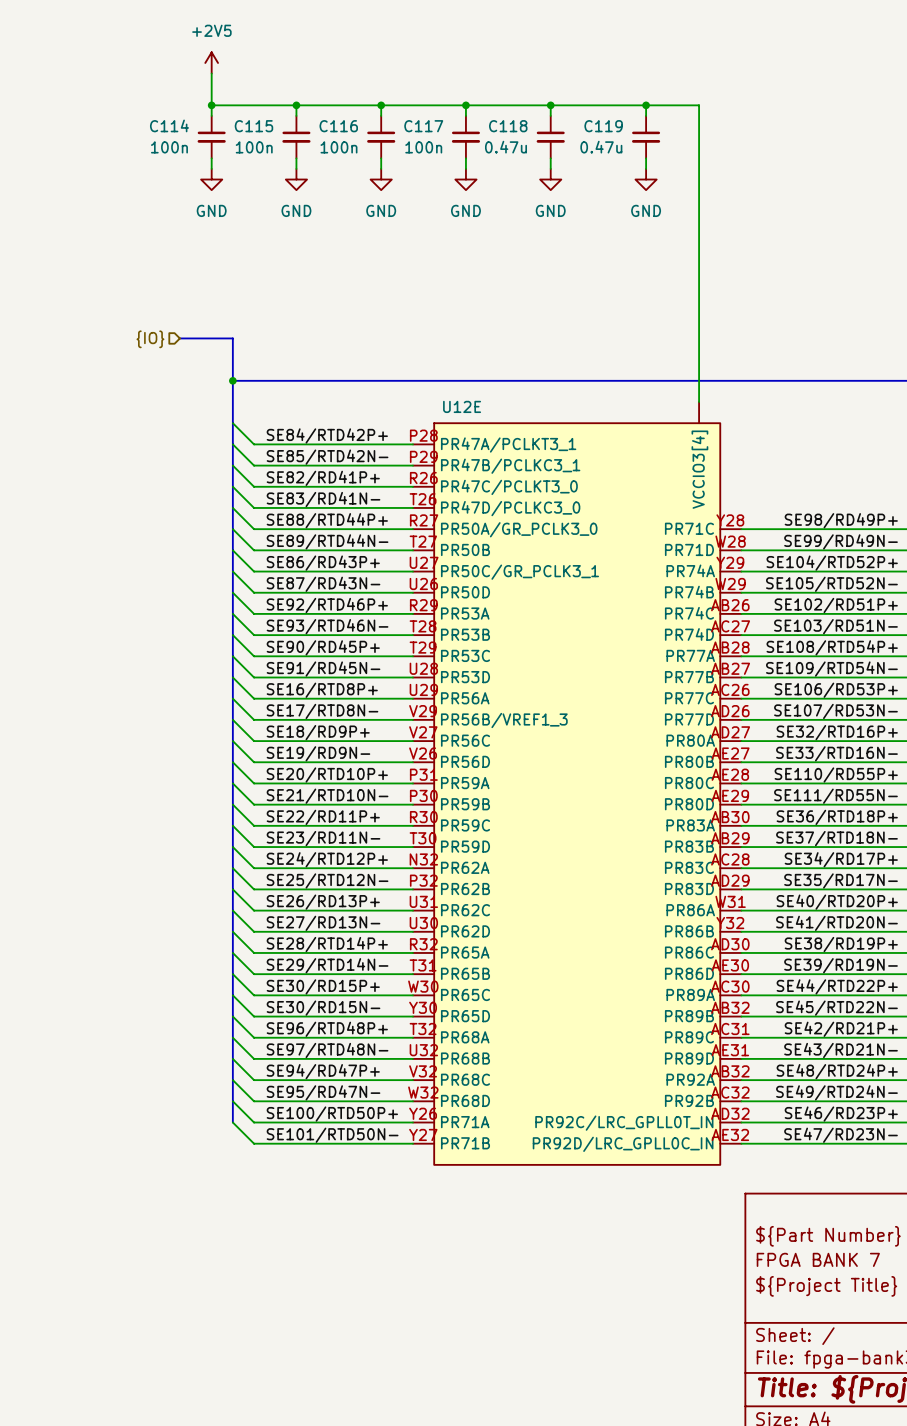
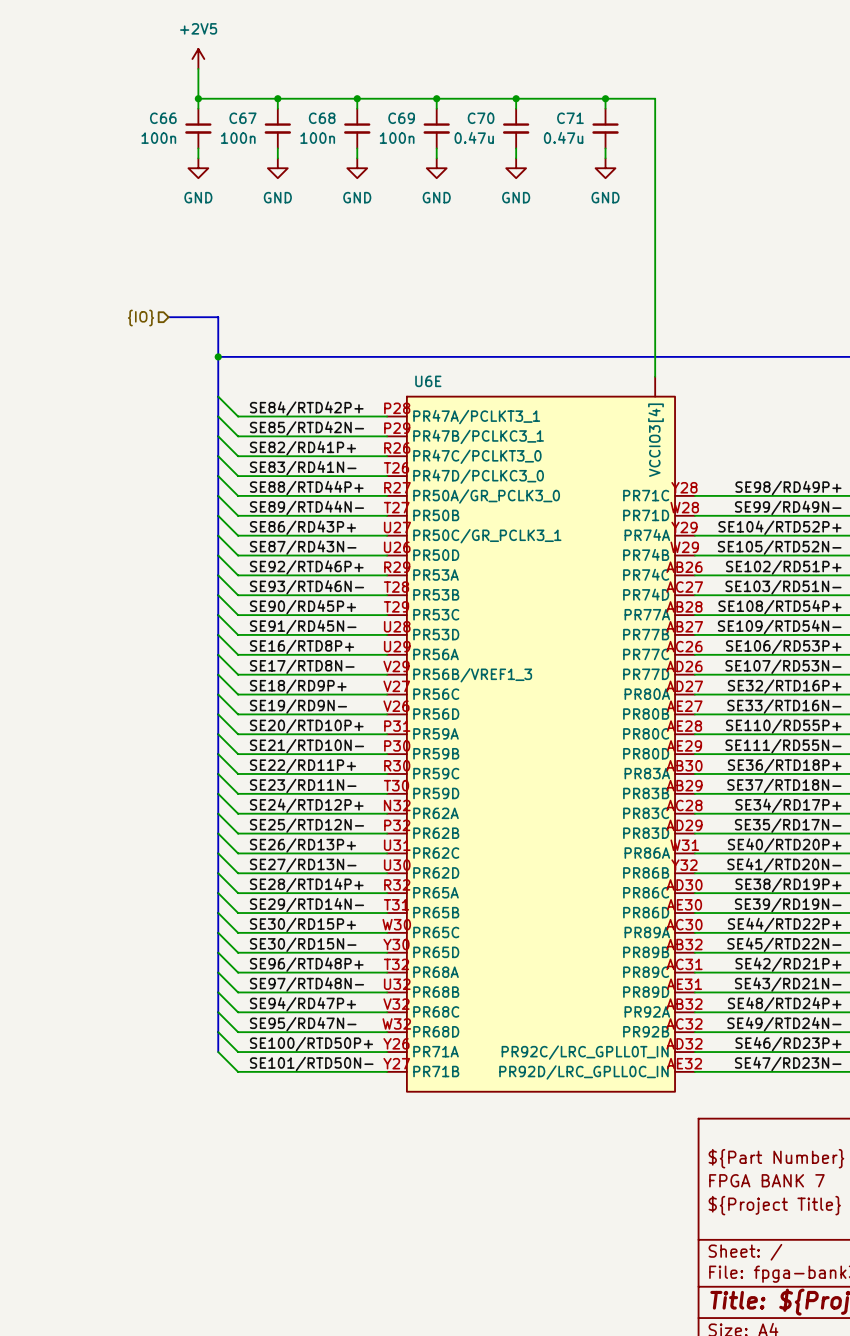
C114 name: C114 (169, 125) -> C66 (163, 118)
C115 name: C115 (253, 126) -> C67 (242, 118)
C116 name: C116 (338, 126) -> C68 (322, 118)
C117 name: C117 (423, 126) -> C69 (401, 118)
C118 name: C118 (508, 126) -> C70 (481, 118)
C119 name: C119 (603, 126) -> C71 (570, 118)
U12E name: U12E (462, 406) -> U6E (428, 381)

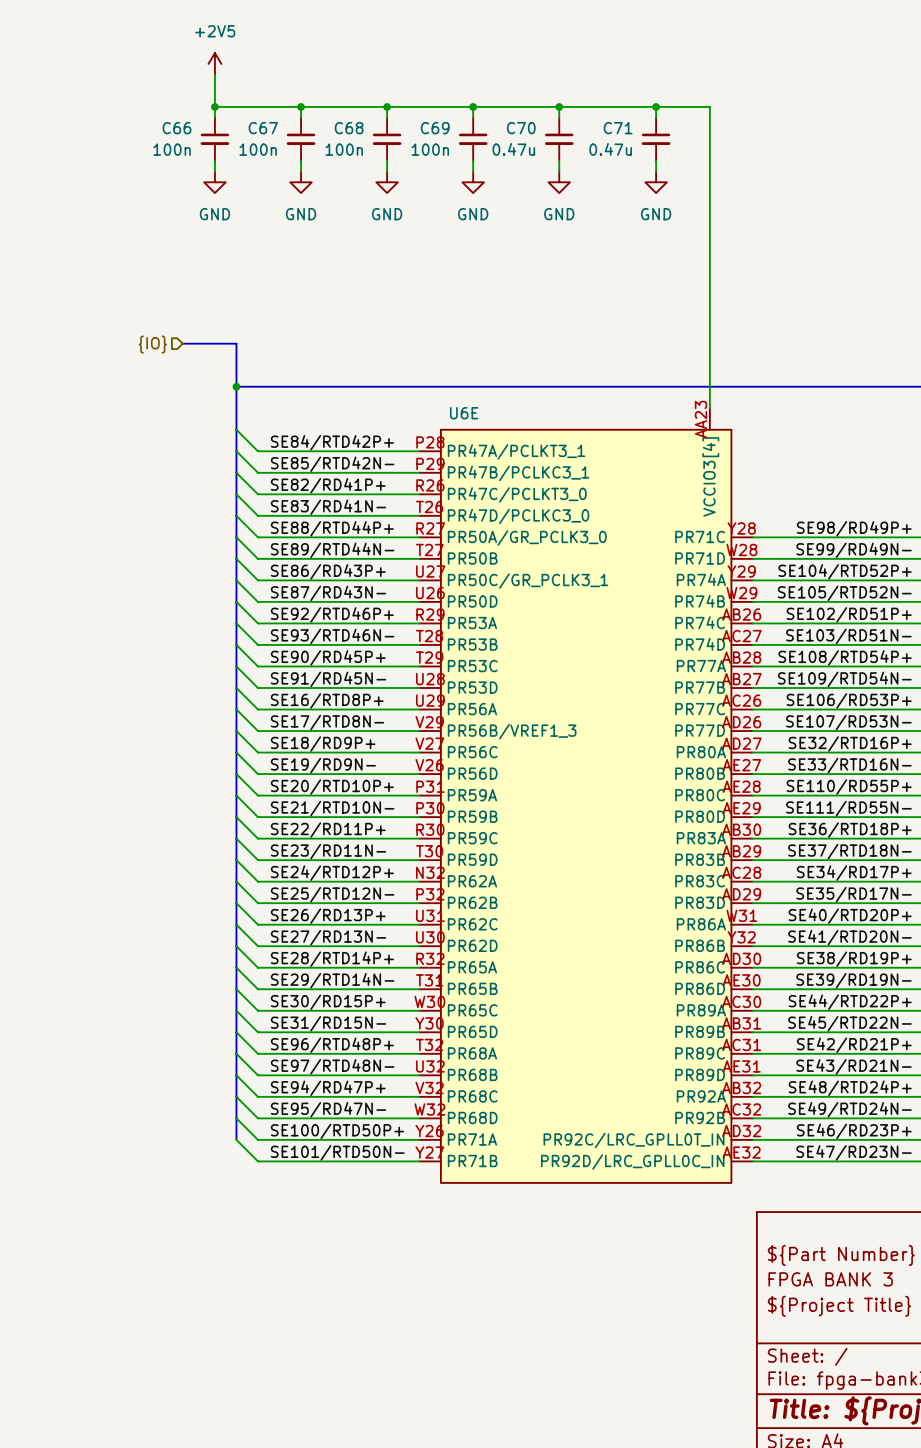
U6E pin number: none -> AA23 (701, 419)
label: SE30/RD15N- (303, 944) -> SE31/RD15N- (328, 1023)
U6E pin number: AB32 (684, 944) -> AB31 (741, 1023)
title block: FPGA BANK 7 (766, 1180) -> FPGA BANK 3 (830, 1279)

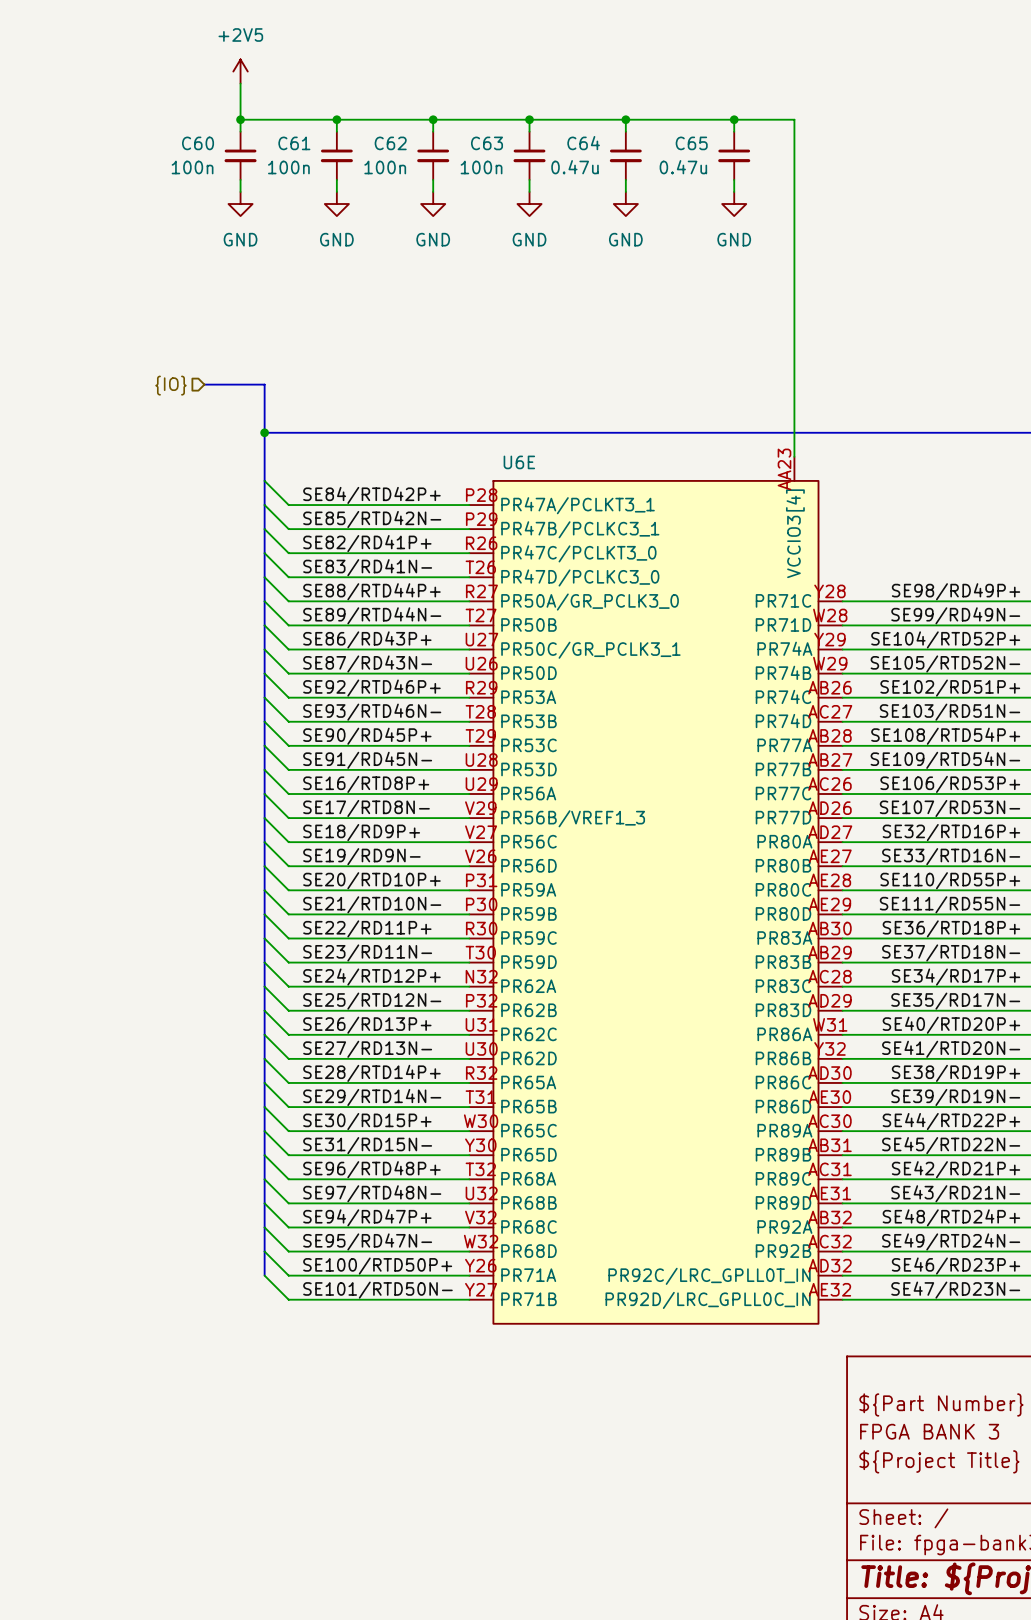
C66 name: C66 (176, 128) -> C60 (198, 143)
C67 name: C67 (263, 128) -> C61 (294, 143)
C68 name: C68 (349, 128) -> C62 (390, 143)
C69 name: C69 (435, 128) -> C63 (487, 143)
C70 name: C70 (521, 128) -> C64 (583, 143)
C71 name: C71 (618, 128) -> C65 (691, 143)

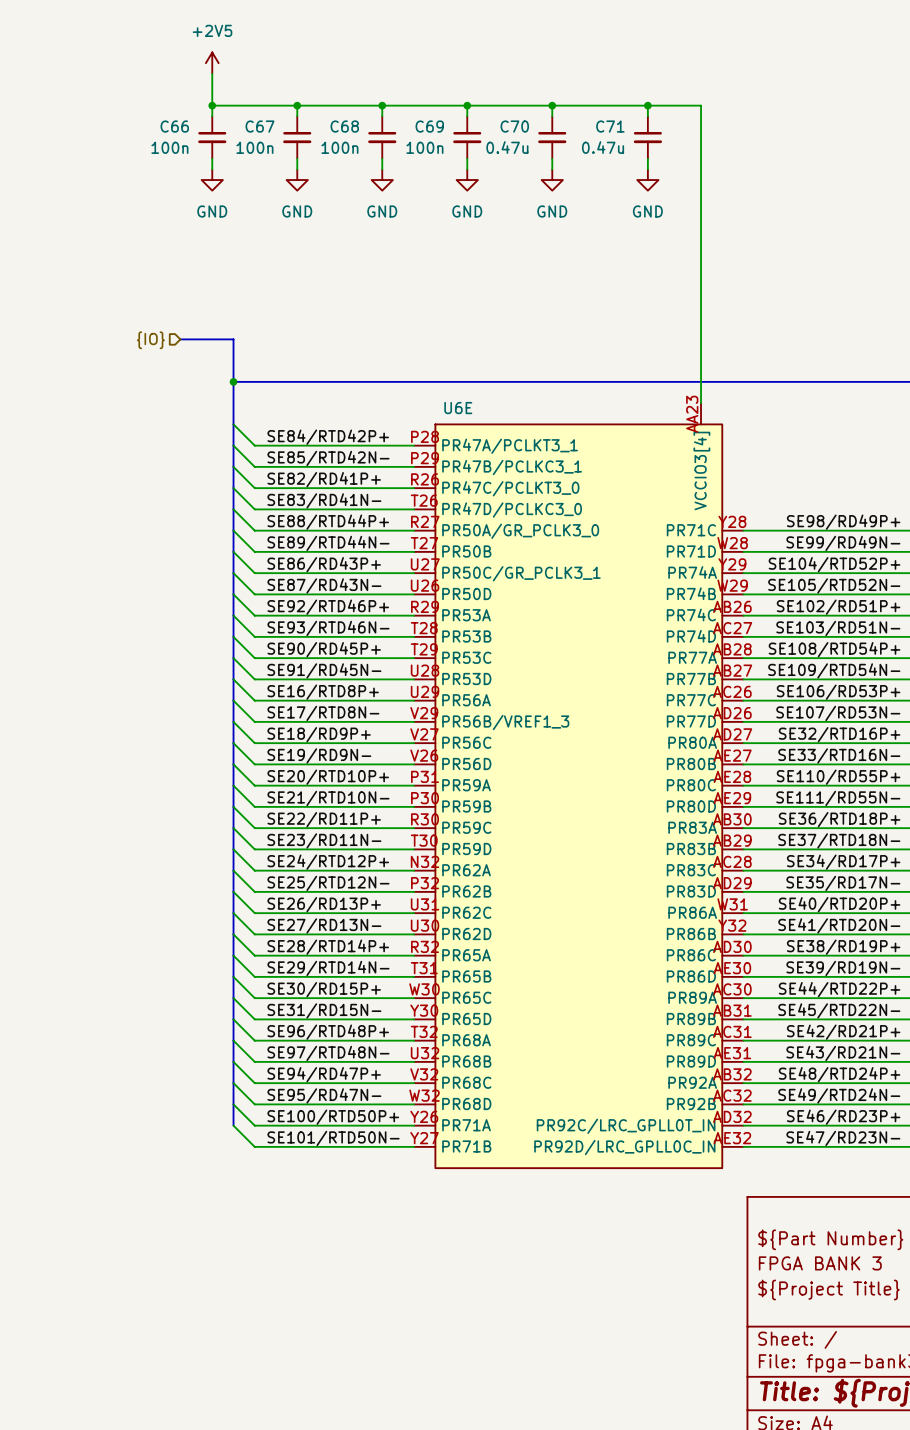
C60 name: C60 (198, 143) -> C66 (174, 126)
C61 name: C61 (294, 143) -> C67 (260, 126)
C62 name: C62 (390, 143) -> C68 (344, 126)
C63 name: C63 (487, 143) -> C69 (429, 126)
C64 name: C64 (583, 143) -> C70 (514, 126)
C65 name: C65 (691, 143) -> C71 (610, 126)

